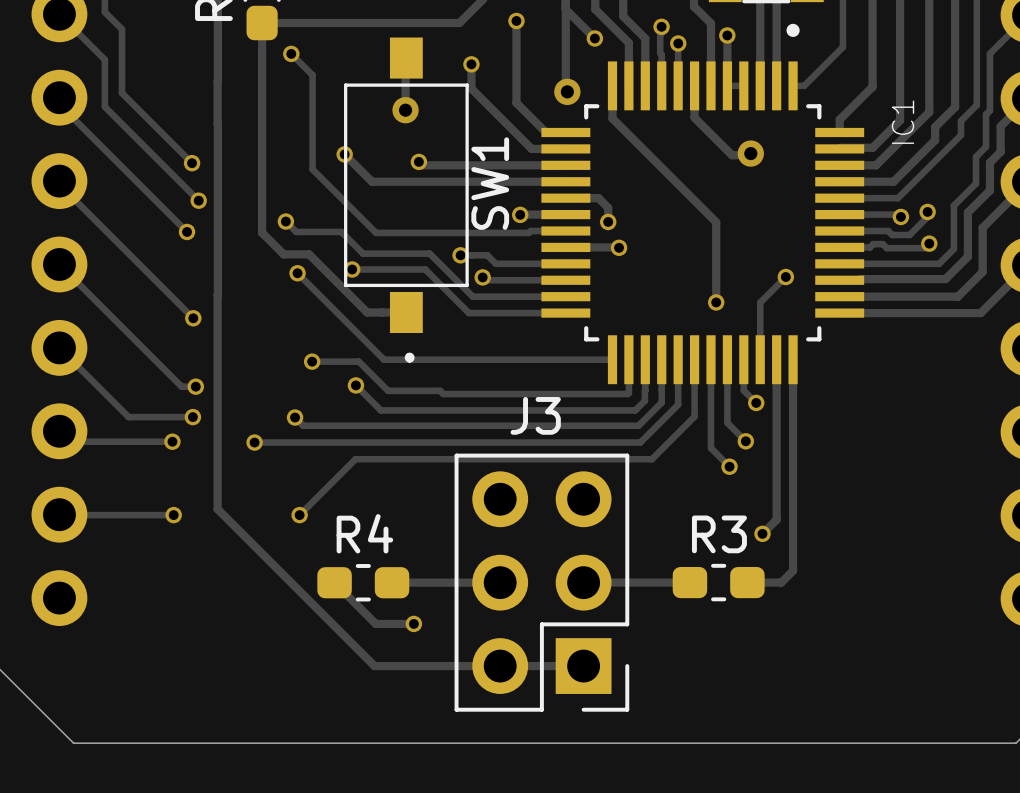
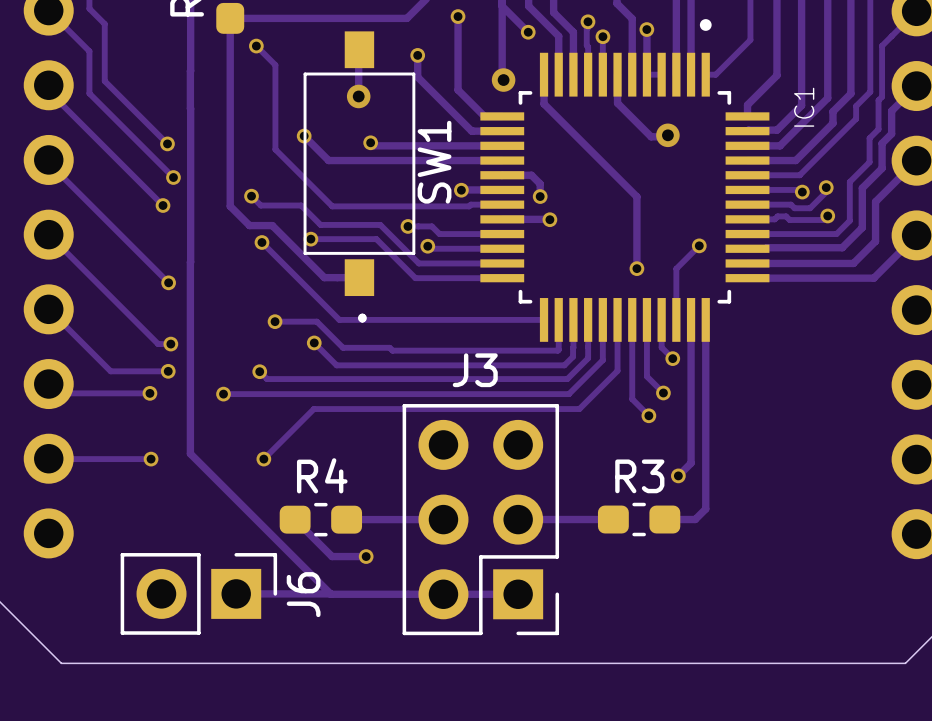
J6: none -> (198, 593)
track: none -> (236, 593) (330, 593)

